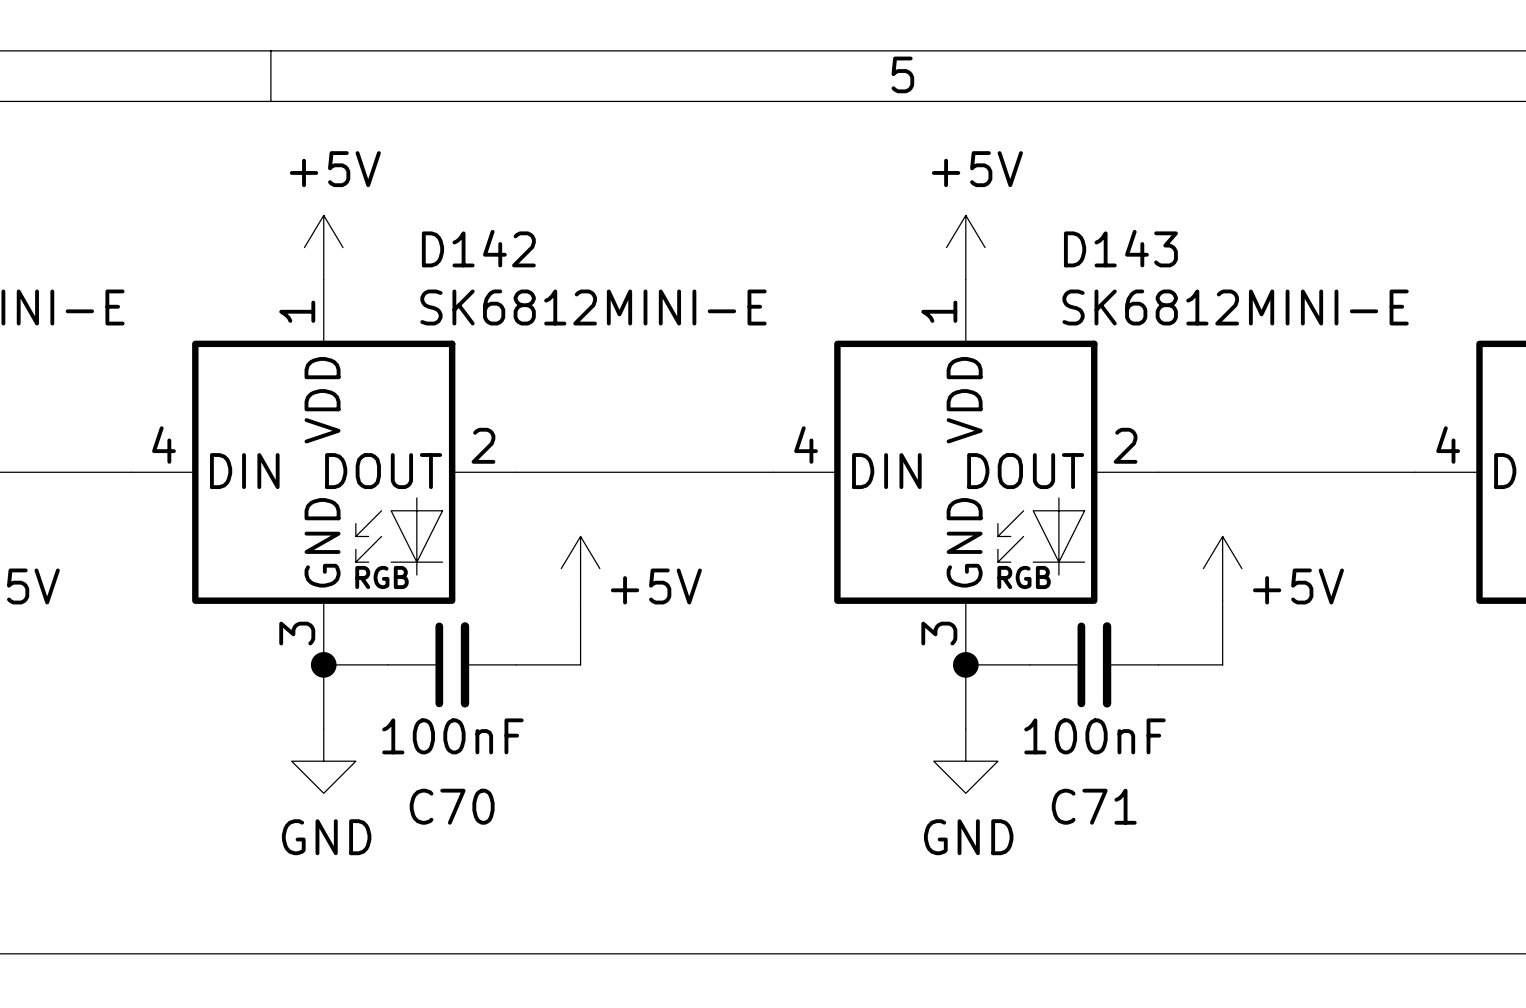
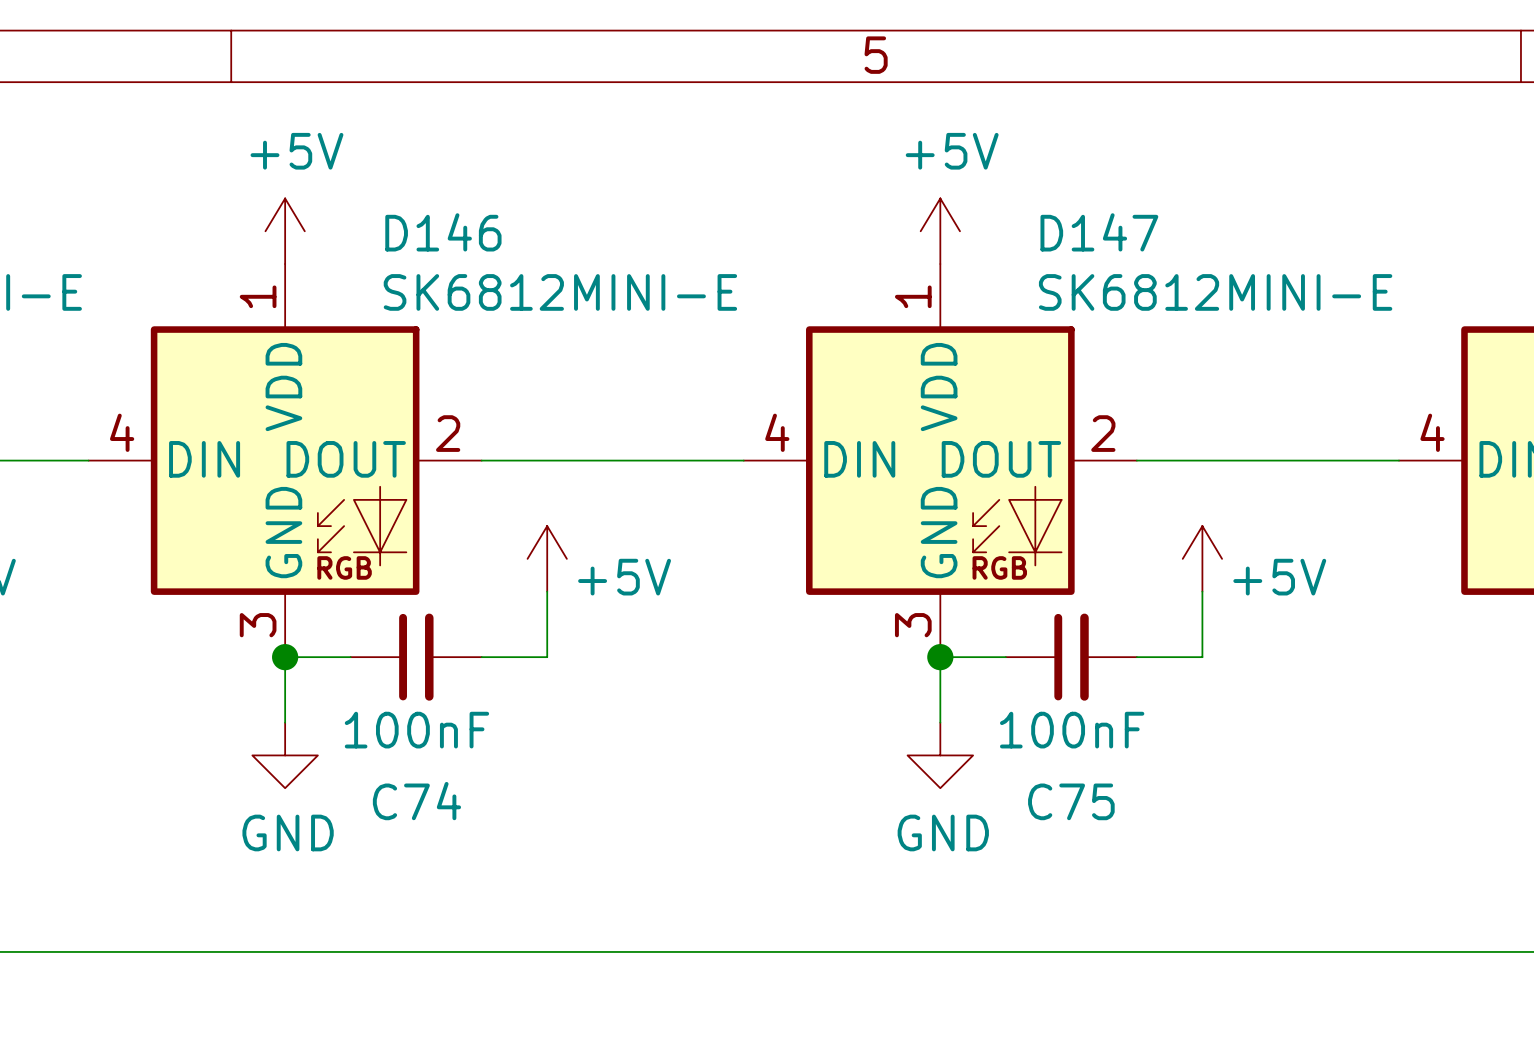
D142 name: D142 (478, 248) -> D146 (443, 232)
D143 name: D143 (1120, 248) -> D147 (1099, 232)
C70 name: C70 (452, 806) -> C74 (416, 801)
C71 name: C71 (1094, 806) -> C75 (1071, 801)

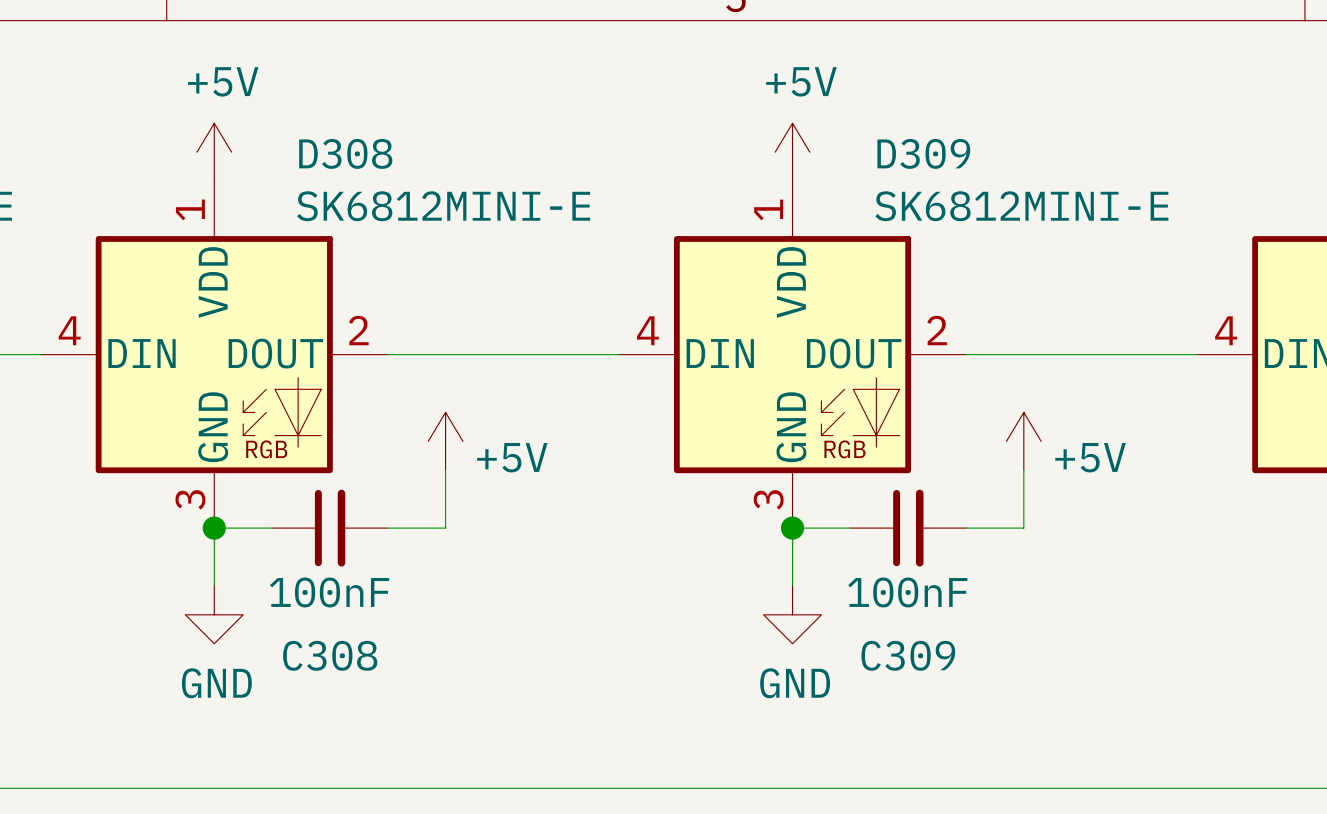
D146 name: D146 (443, 232) -> D308 (345, 153)
D147 name: D147 (1099, 232) -> D309 (923, 153)
C74 name: C74 (416, 801) -> C308 (330, 655)
C75 name: C75 (1071, 801) -> C309 (908, 655)

